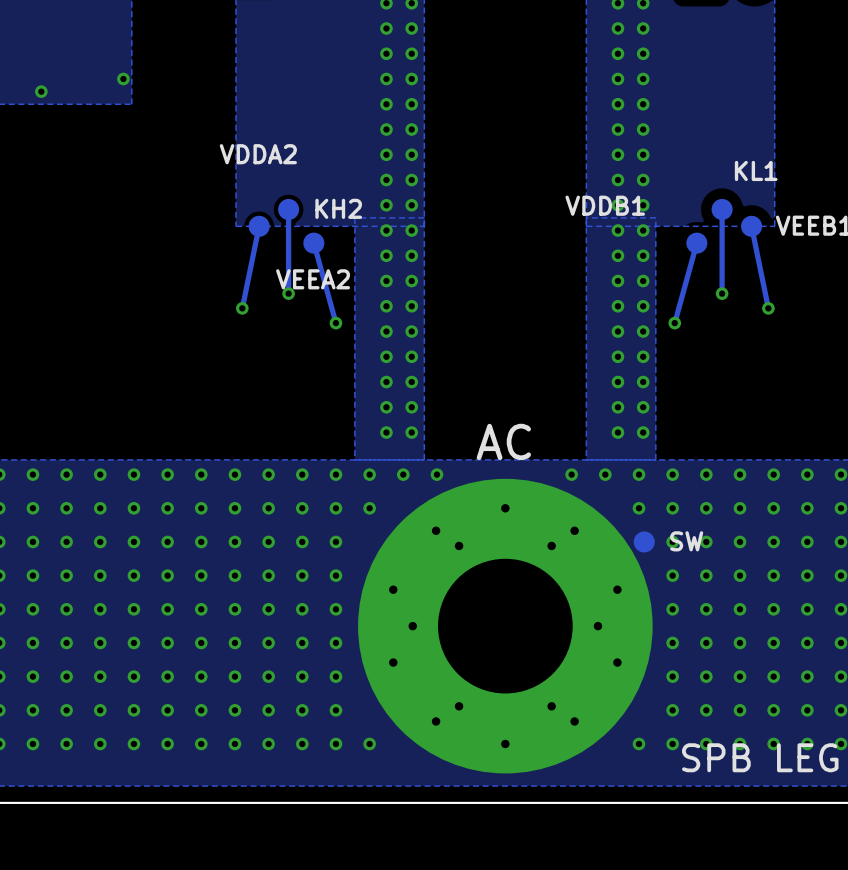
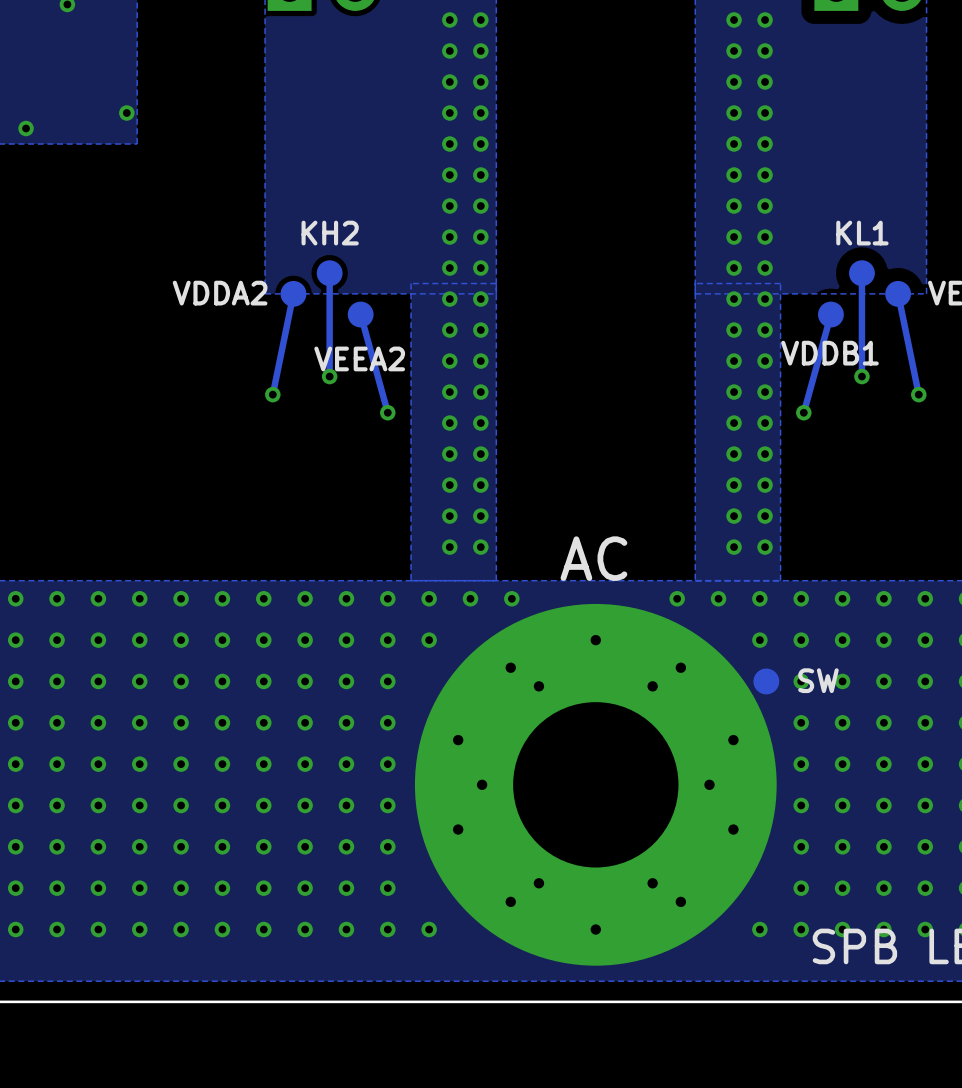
text position: VDDA2 (258, 154) -> VDDA2 (220, 293)
text position: KL1 (756, 170) -> KL1 (862, 233)
text position: VDDB1 (605, 205) -> VDDB1 (829, 353)
text position: KH2 (338, 208) -> KH2 (330, 233)

